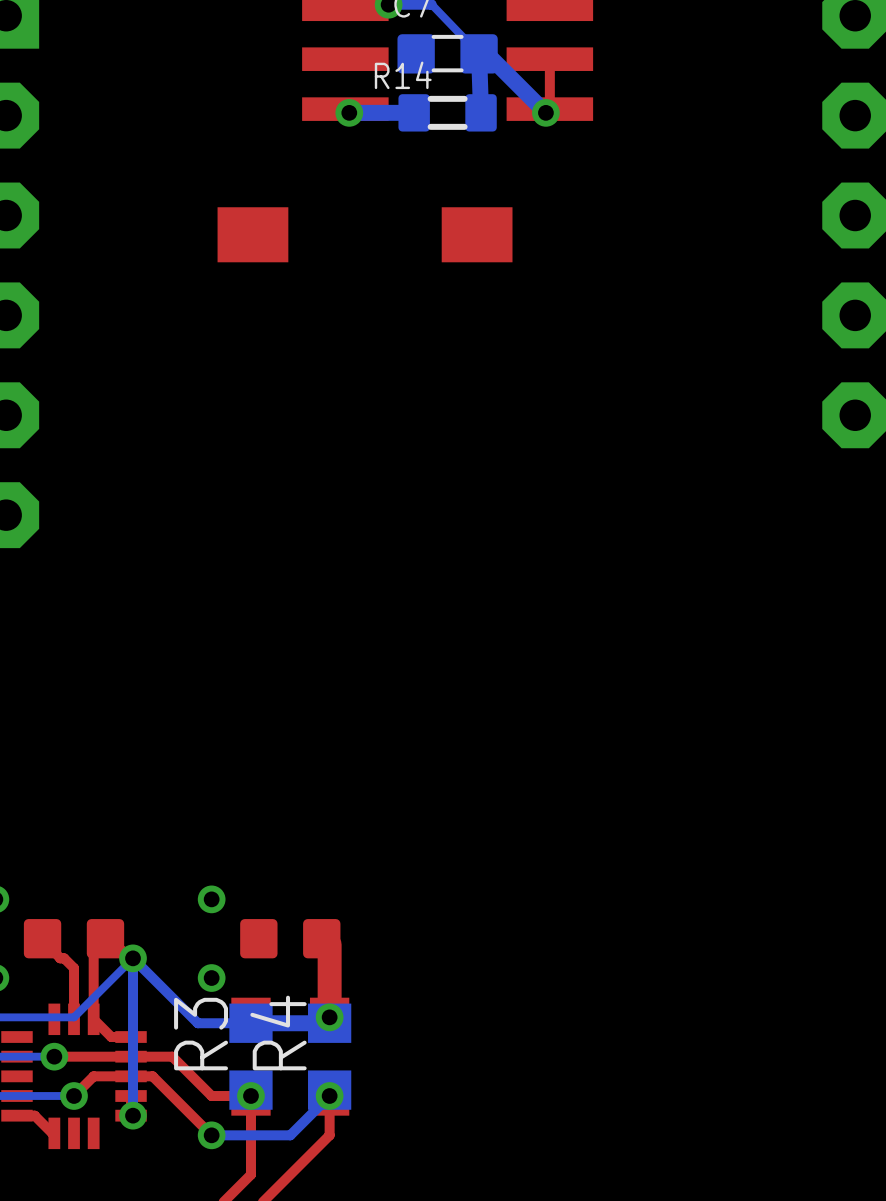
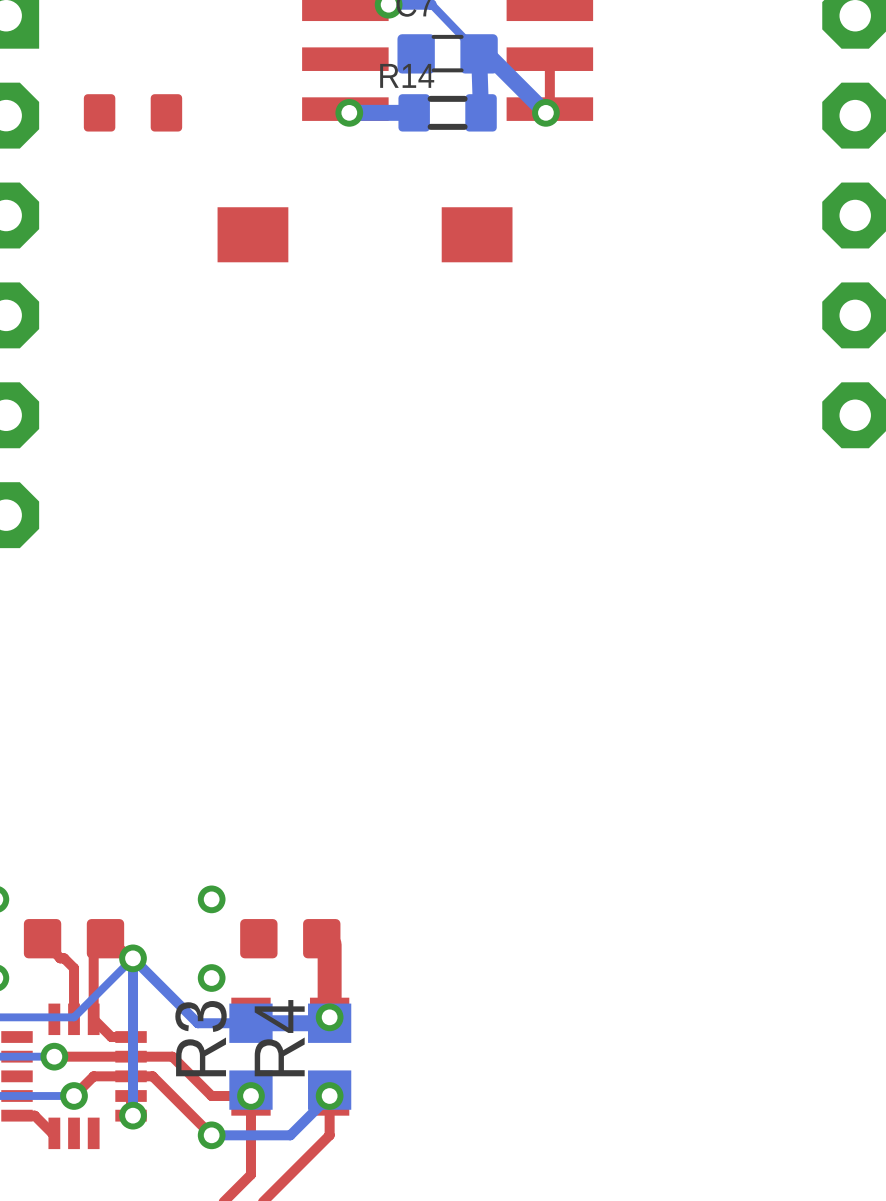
part: none -> (133, 112)

